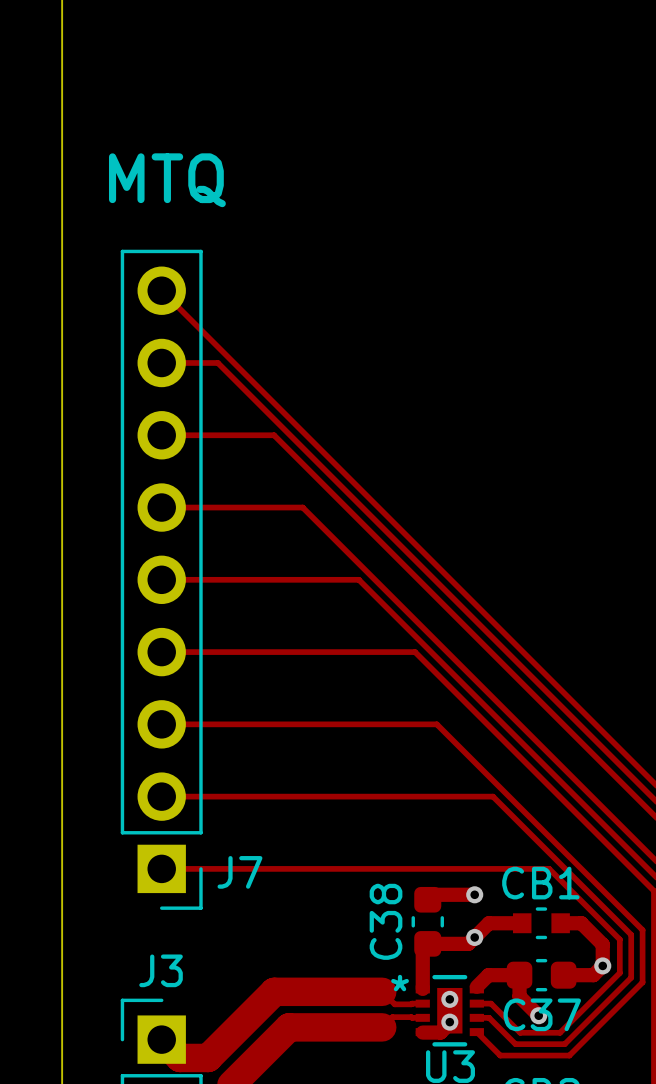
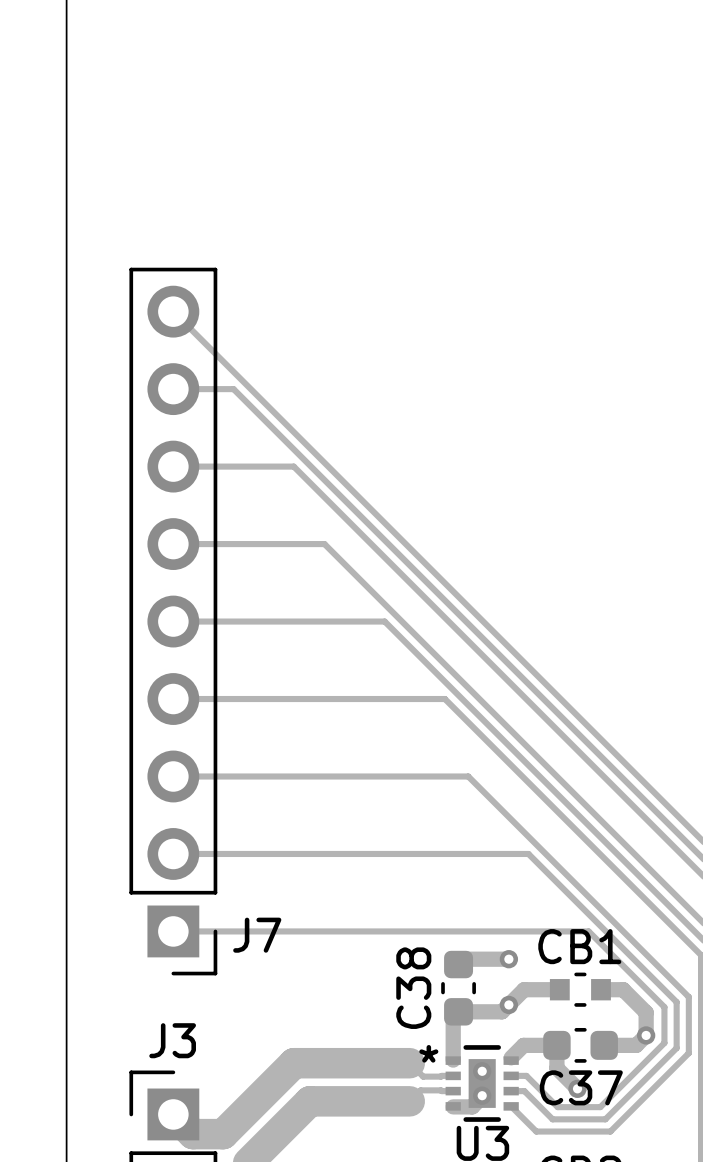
text: MTQ (167, 180) -> none

